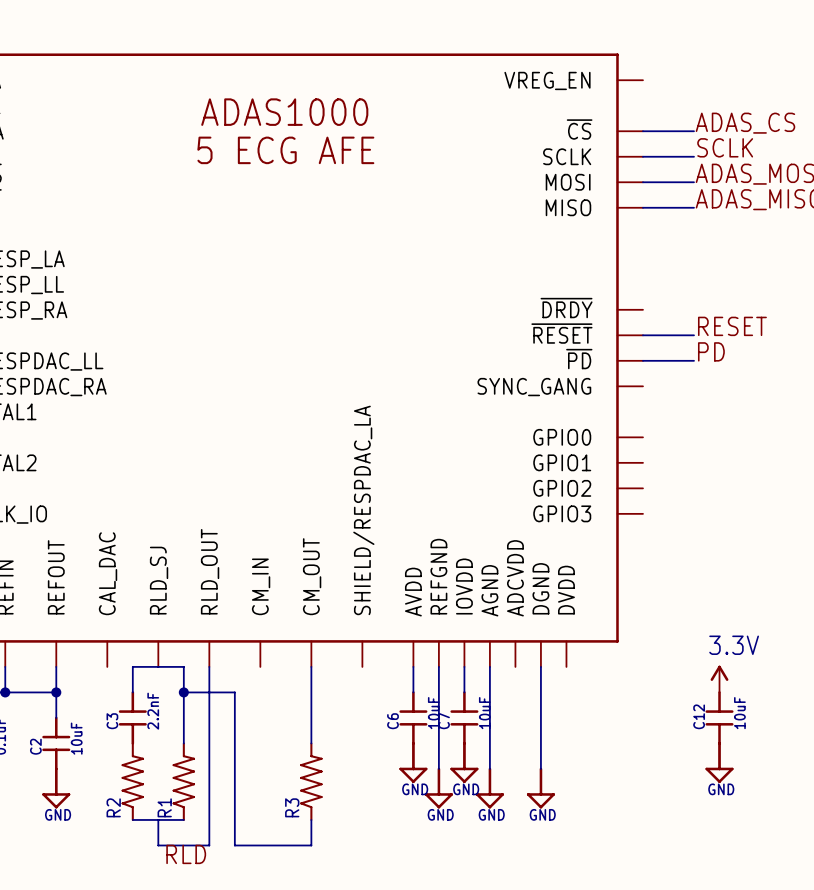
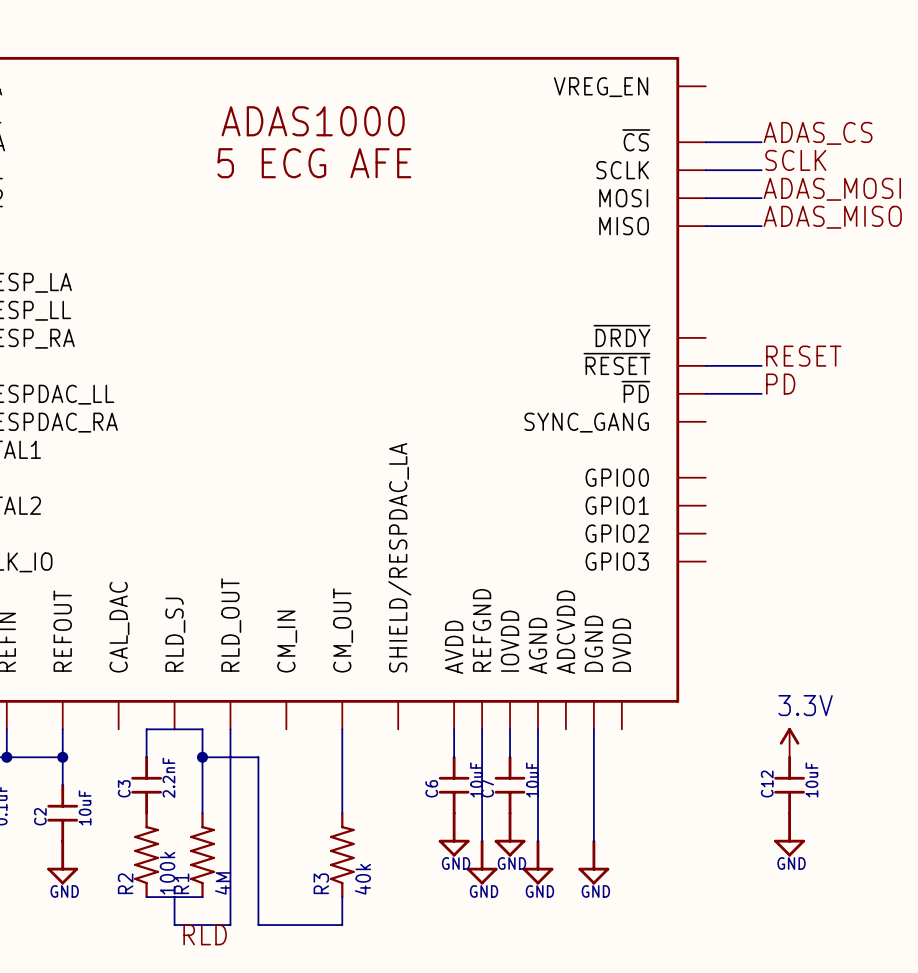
R2 value: none -> 100k (167, 873)
R3 value: none -> 40k (362, 879)
R1 value: none -> 4M (223, 883)

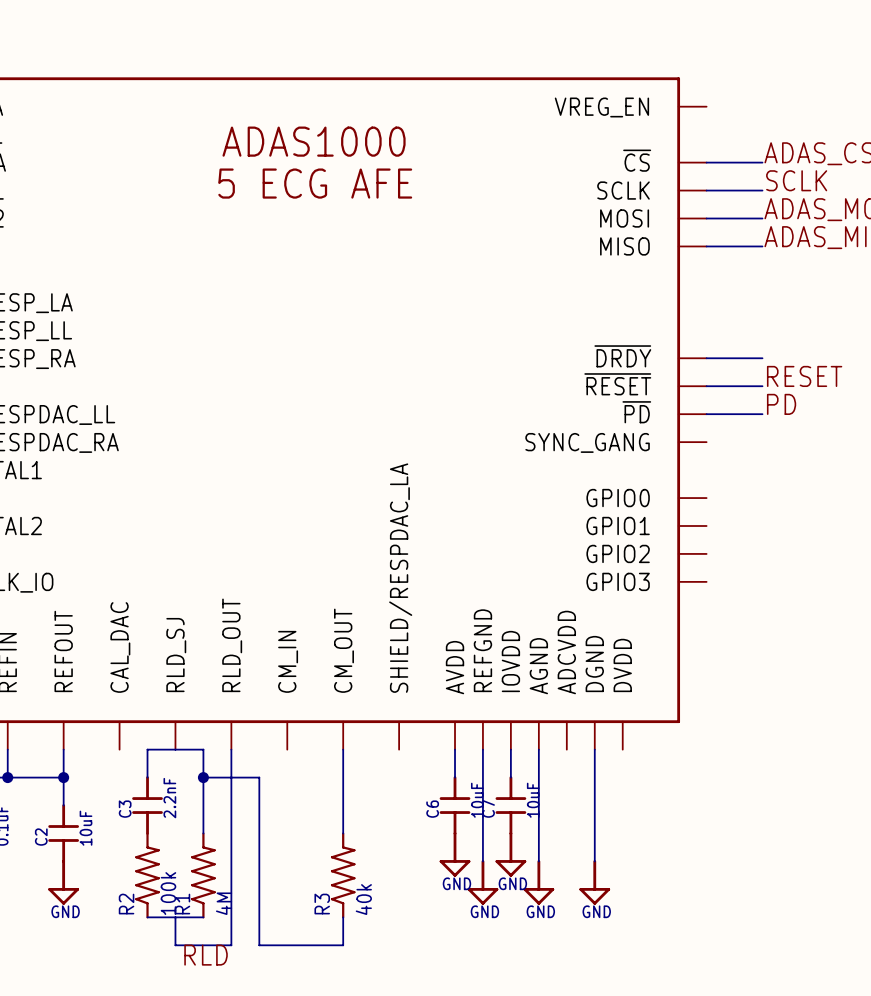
wire: none -> (706, 358) (762, 358)
power symbol: 3.3V (789, 742) -> none
C12: 10uF (789, 785) -> none
power symbol: GND (789, 834) -> none

